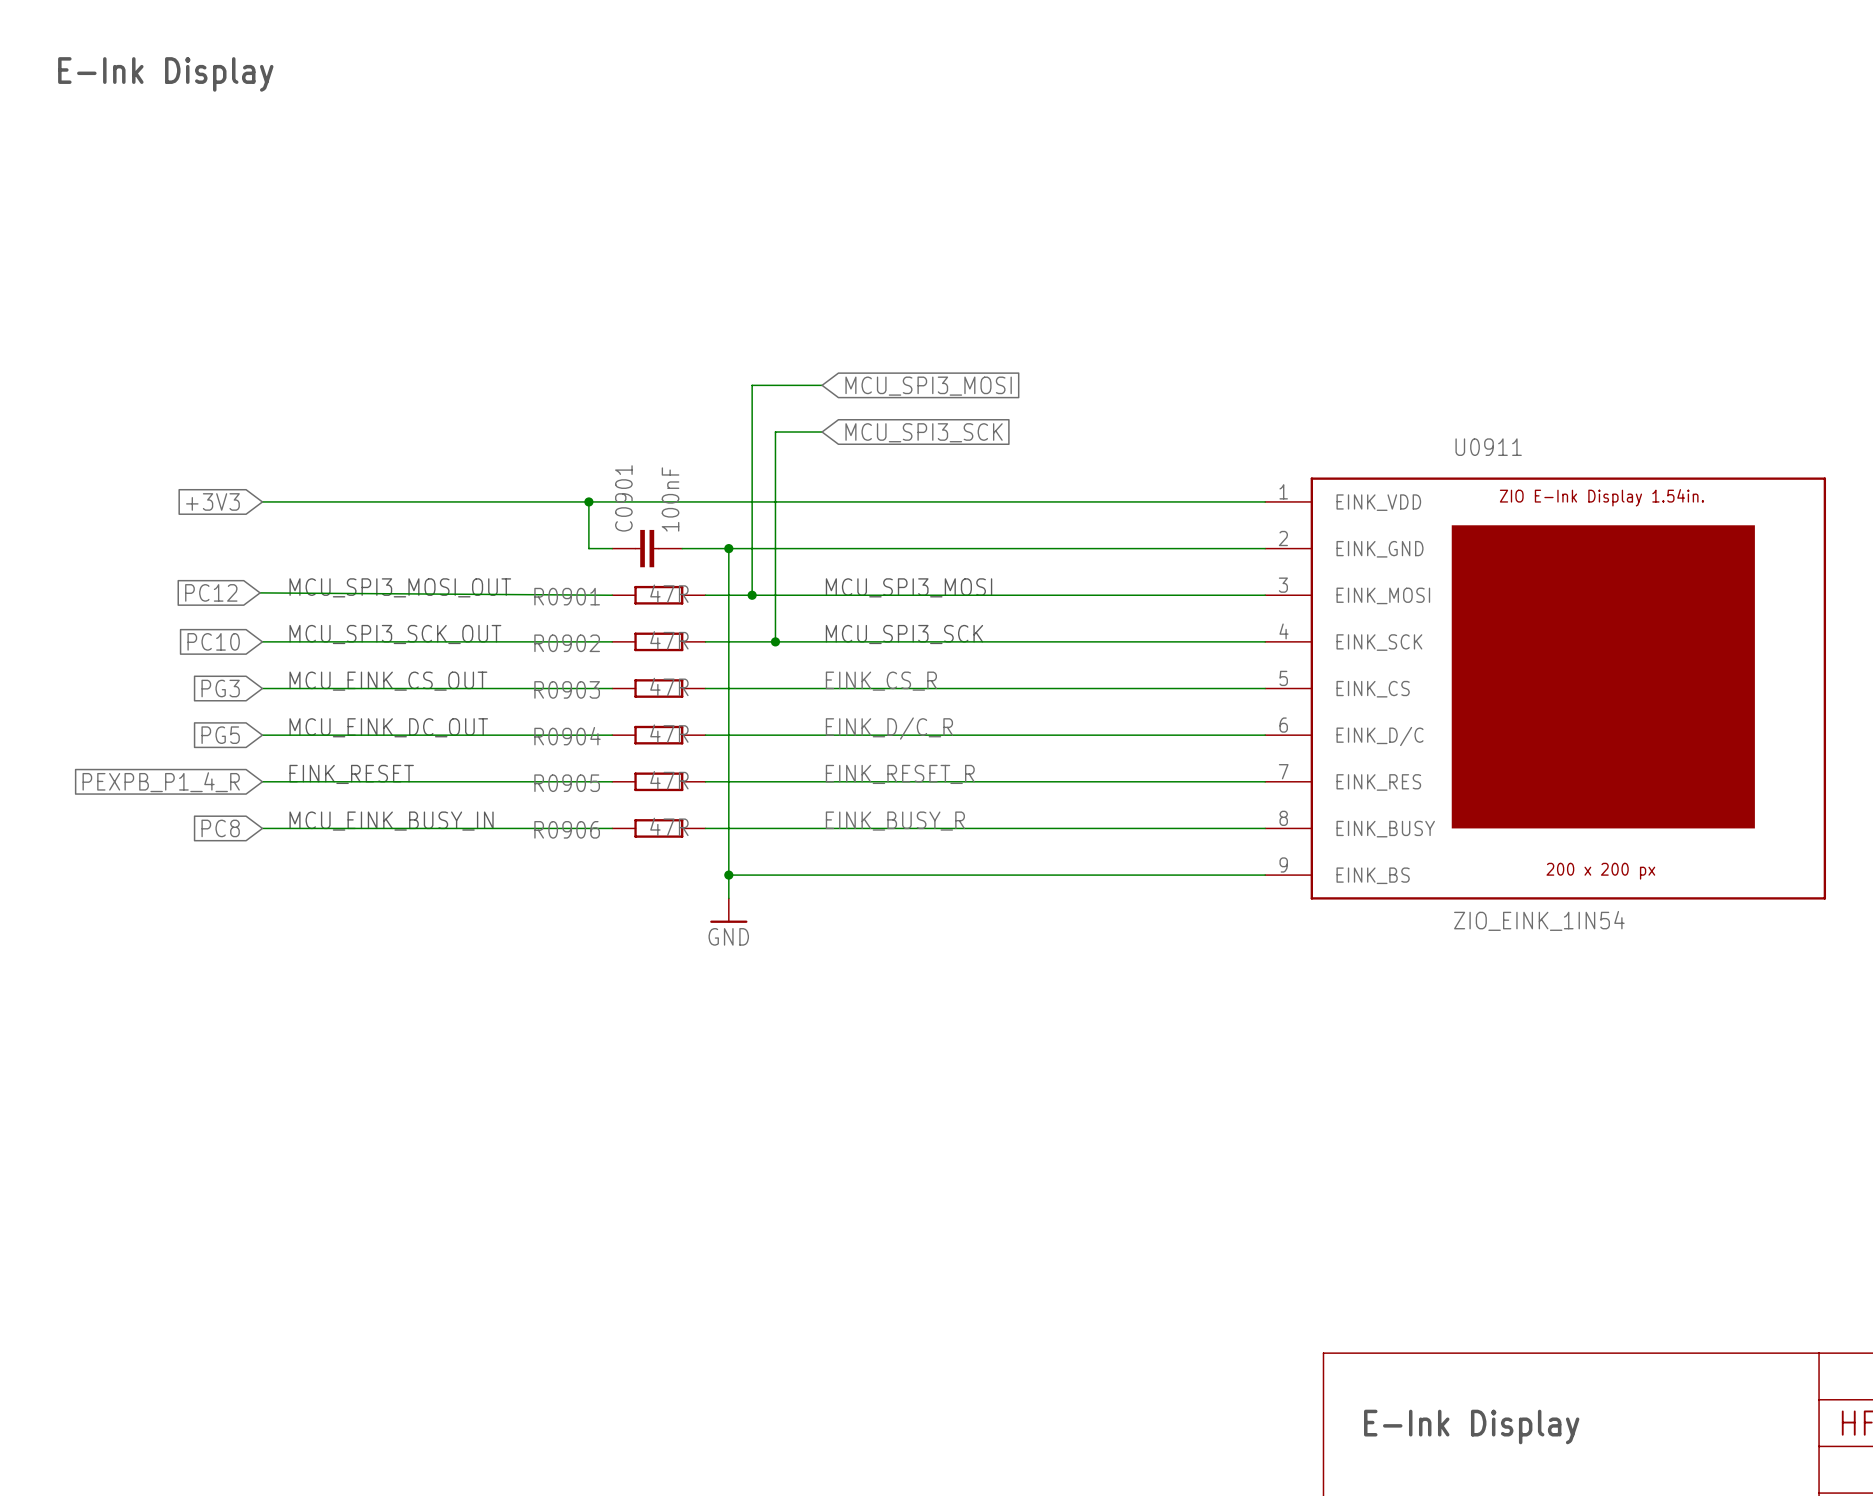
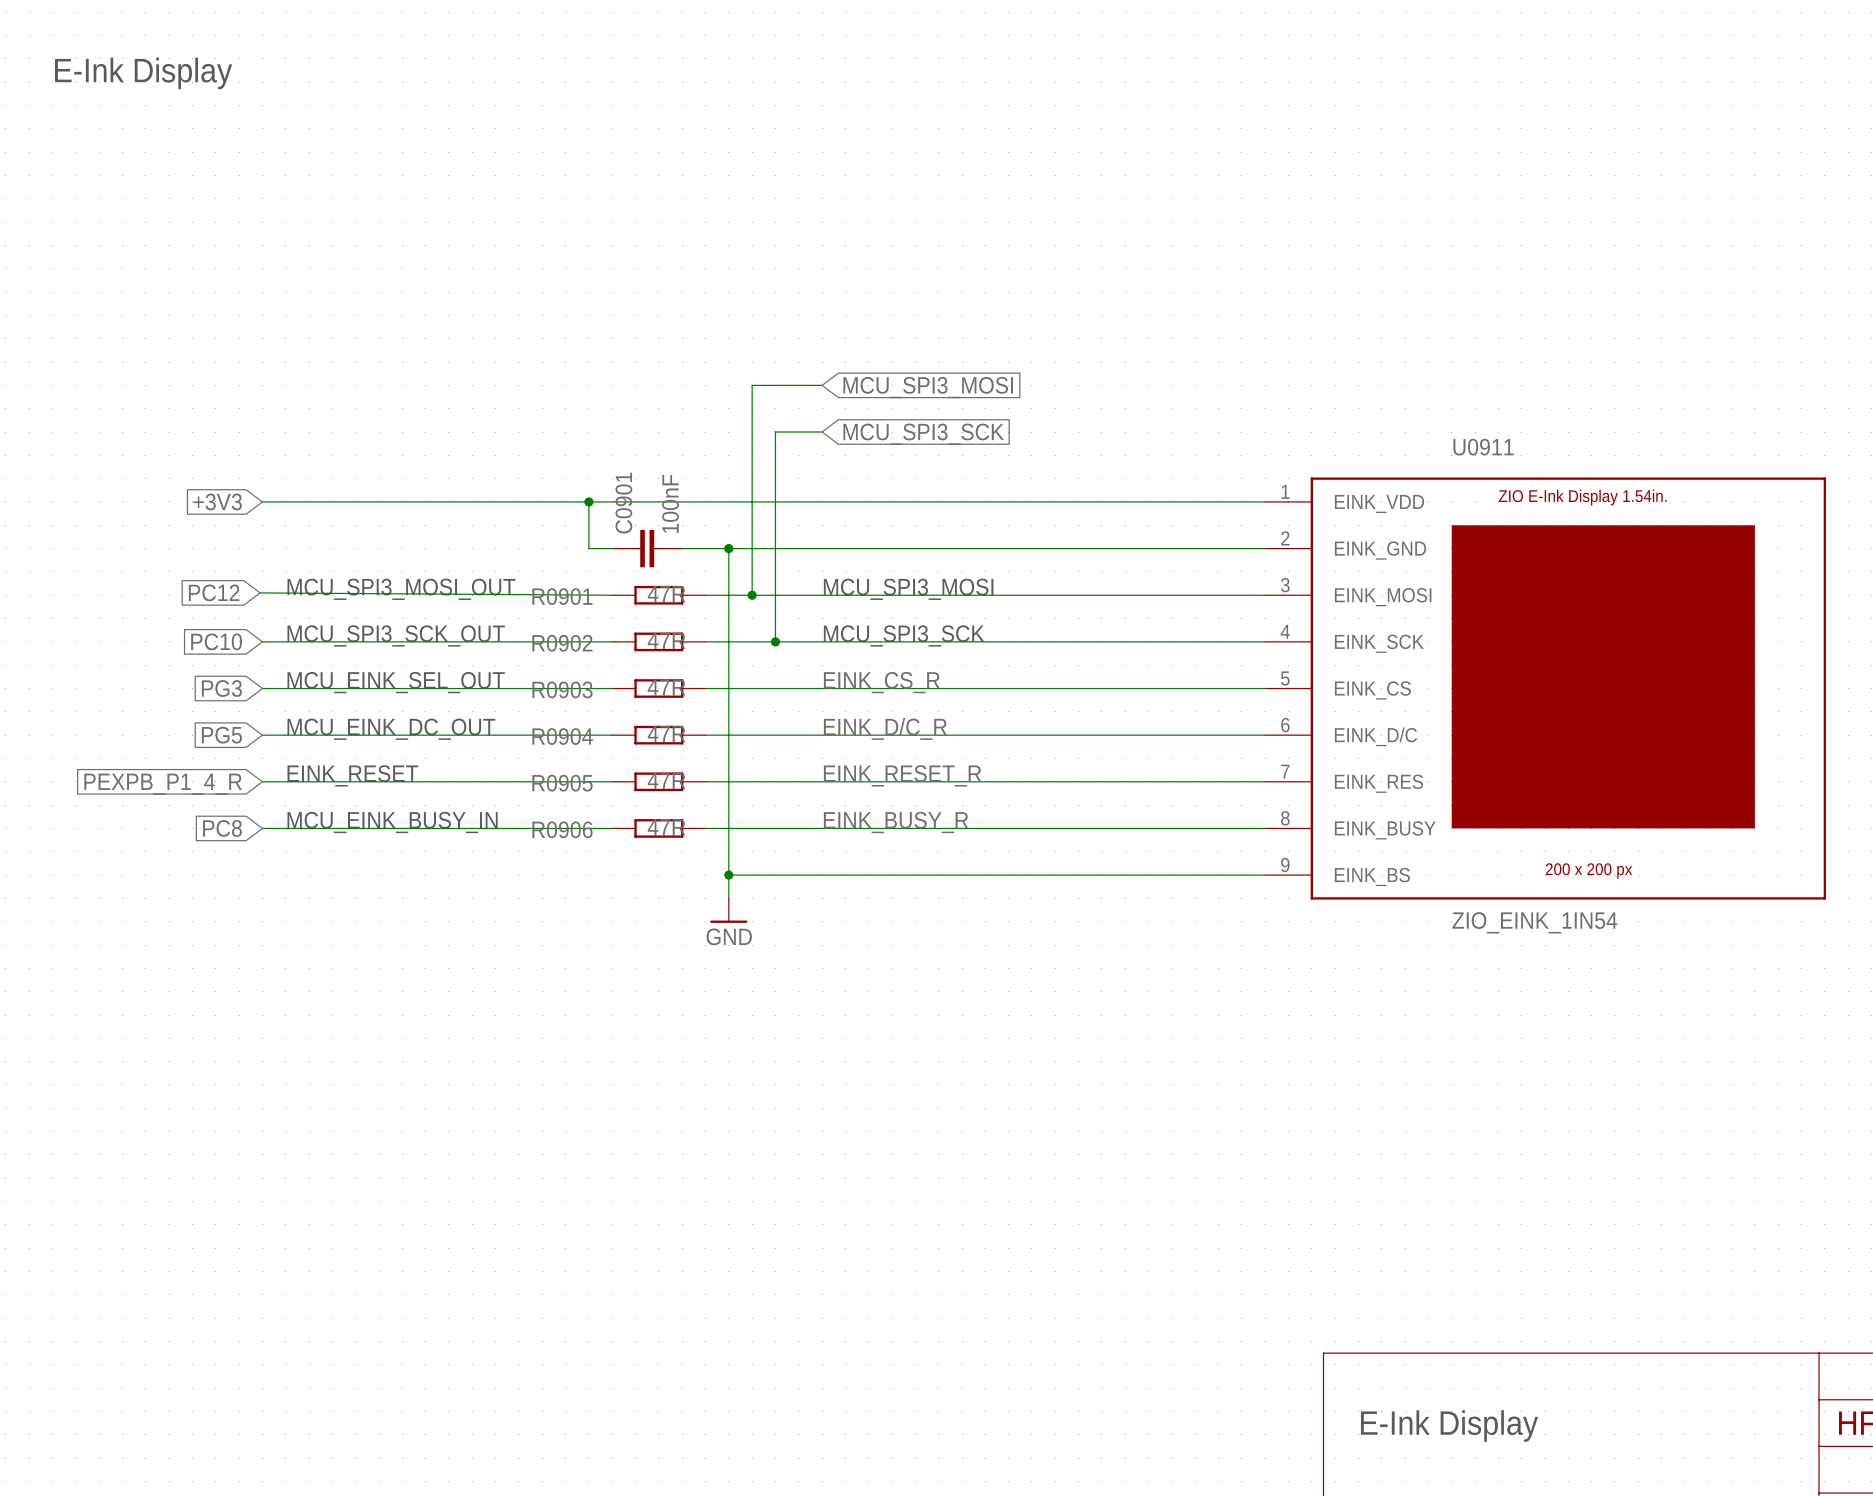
text: MCU_EINK_CS_OUT (388, 681) -> MCU_EINK_SEL_OUT (396, 682)

